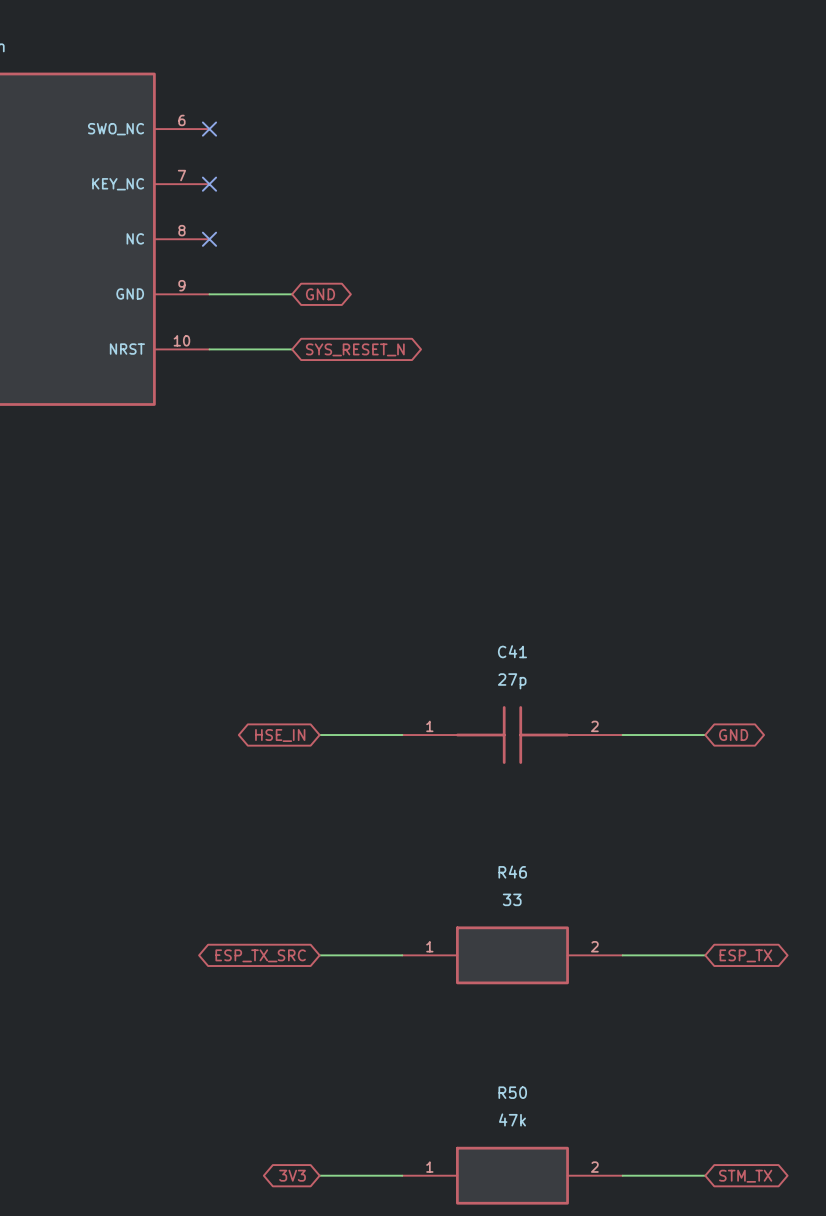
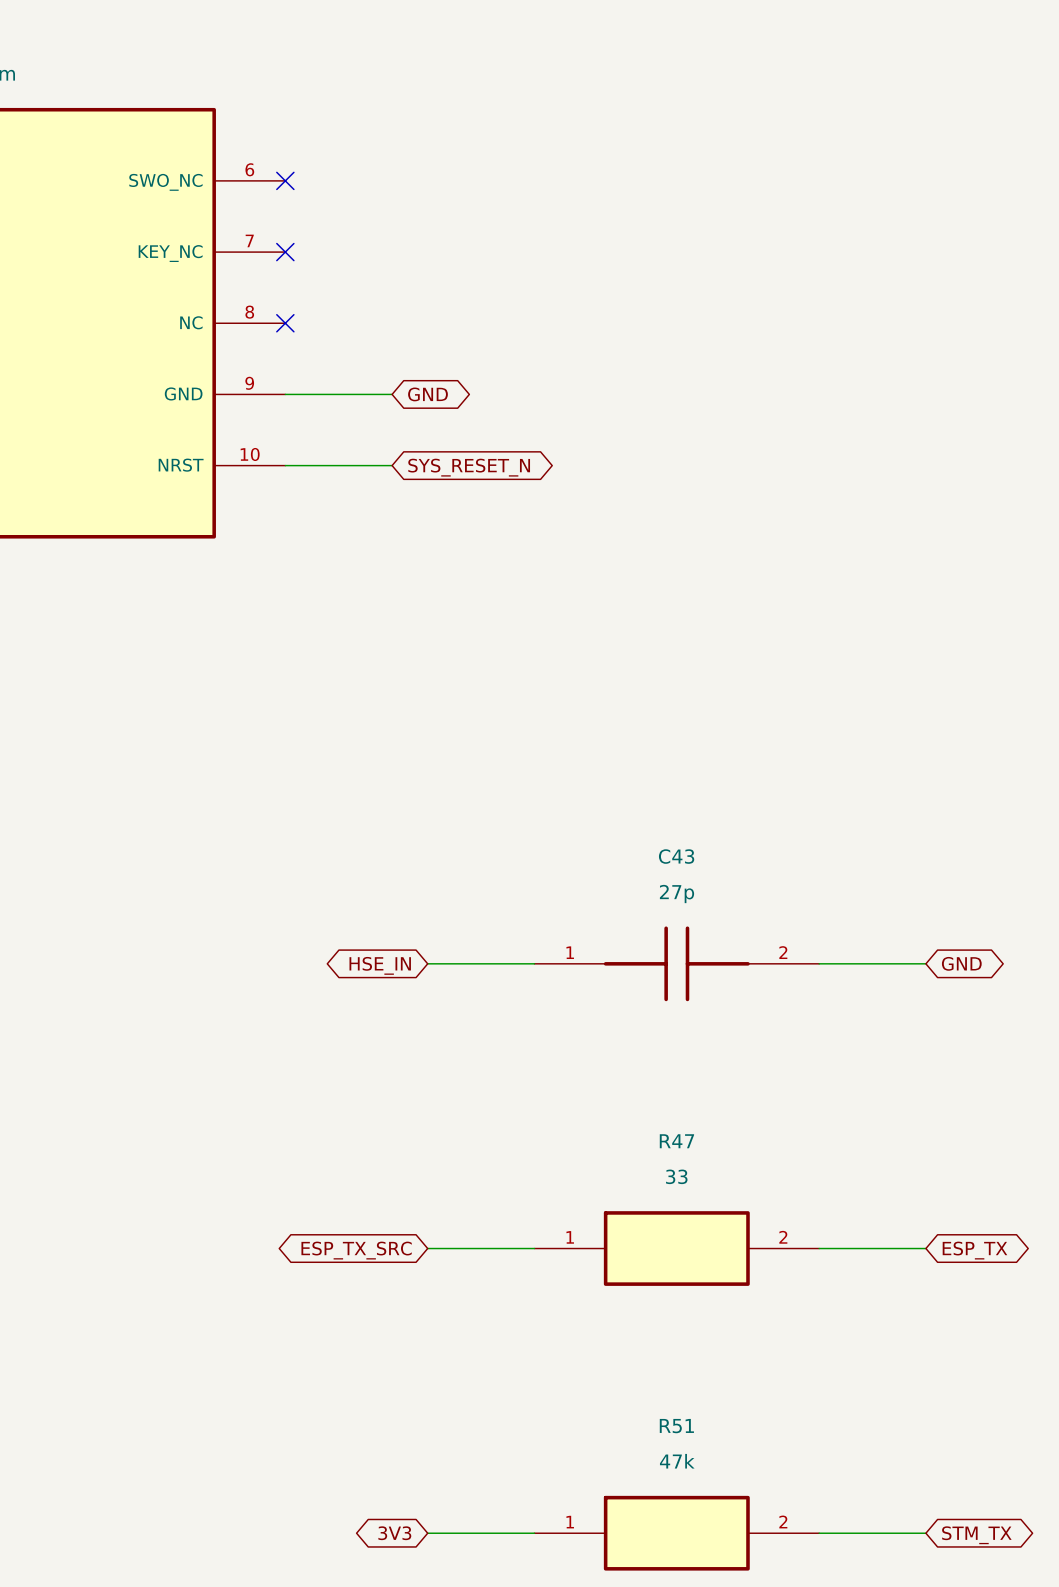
C41 name: C41 (512, 651) -> C43 (676, 856)
R46 name: R46 (512, 872) -> R47 (676, 1141)
R50 name: R50 (512, 1092) -> R51 (676, 1426)

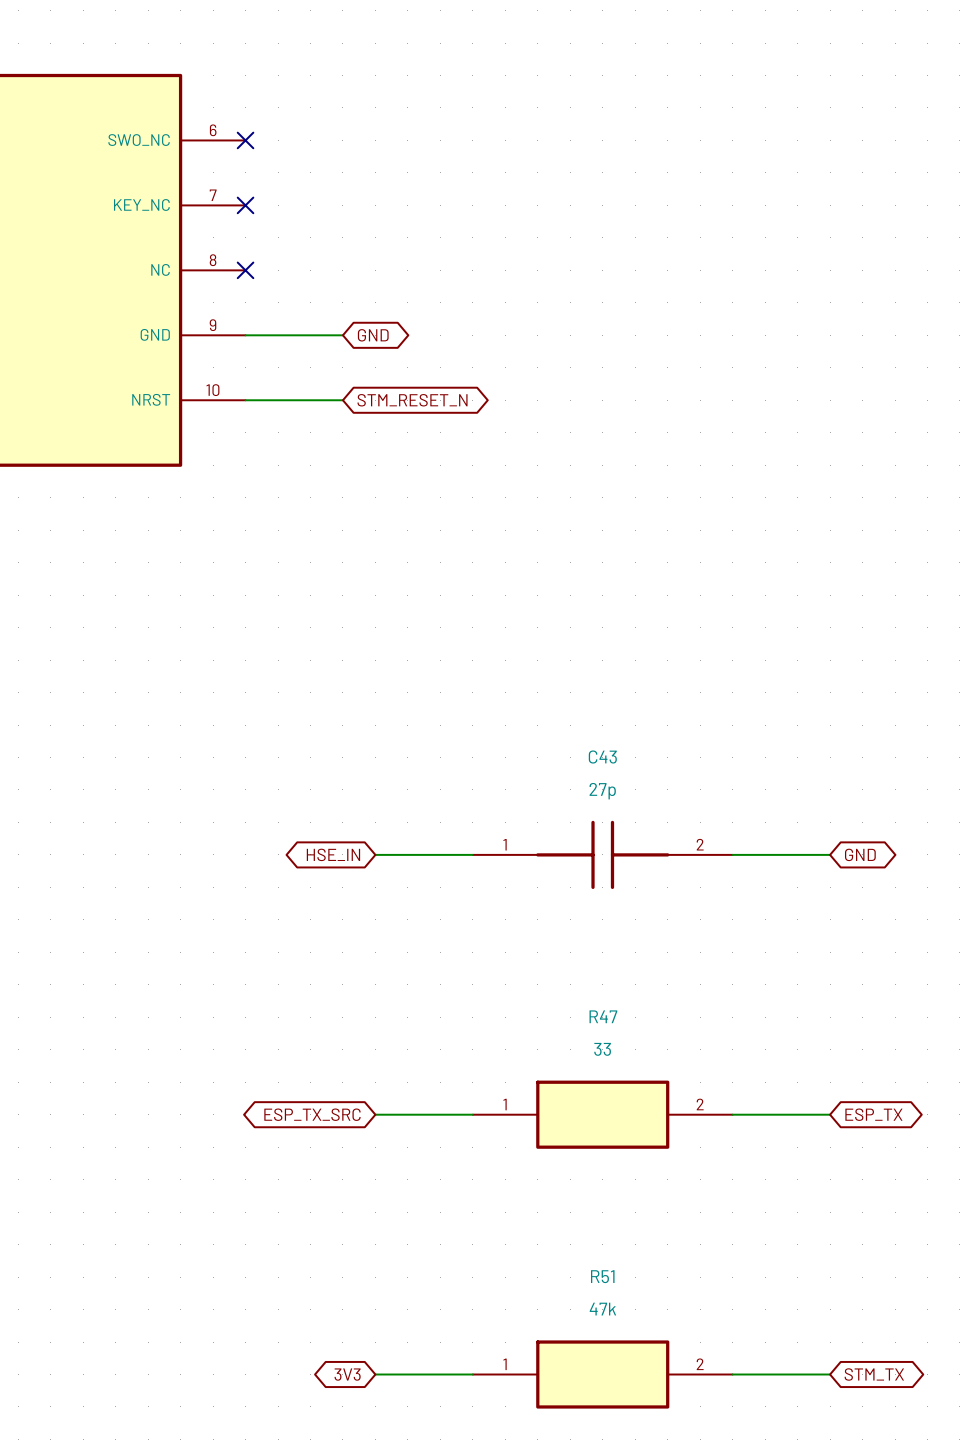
global label: SYS_RESET_N (469, 467) -> STM_RESET_N (412, 400)

